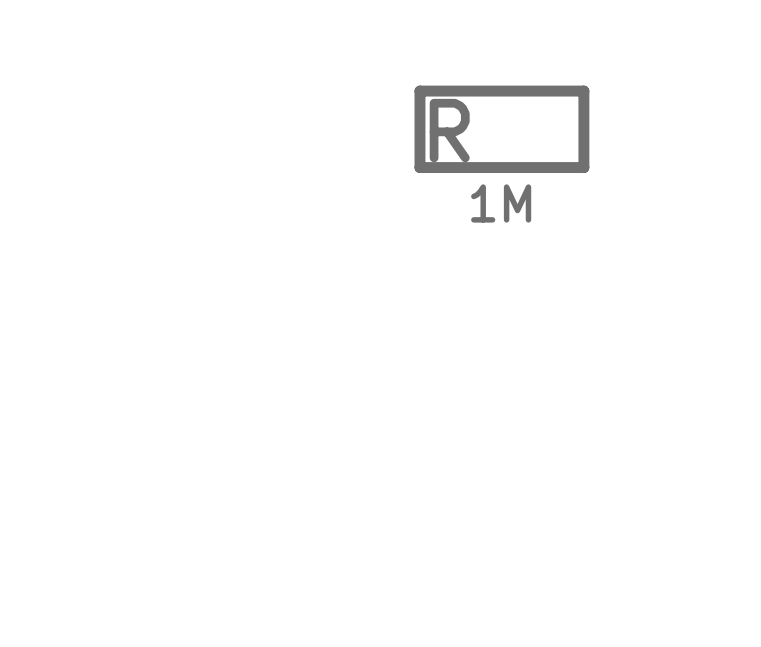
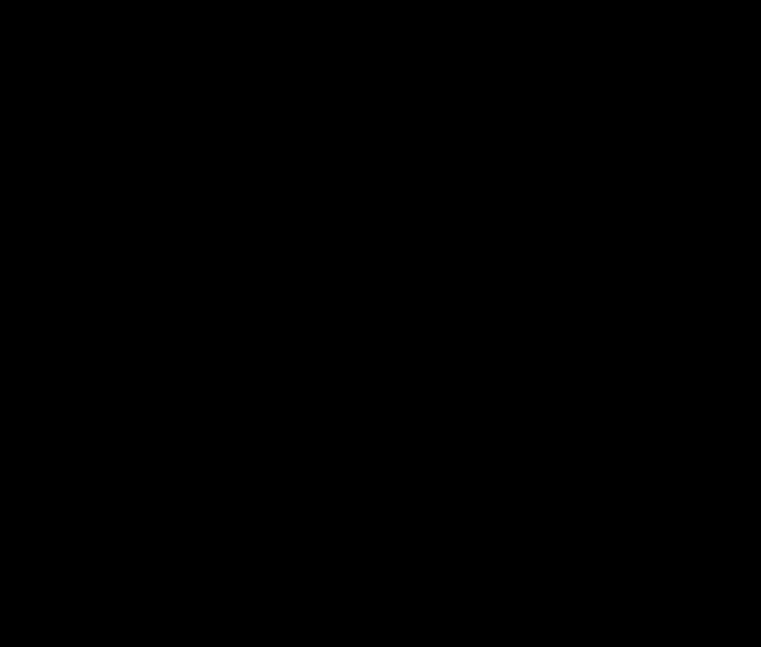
drawing: [414, 85, 590, 174] -> none

